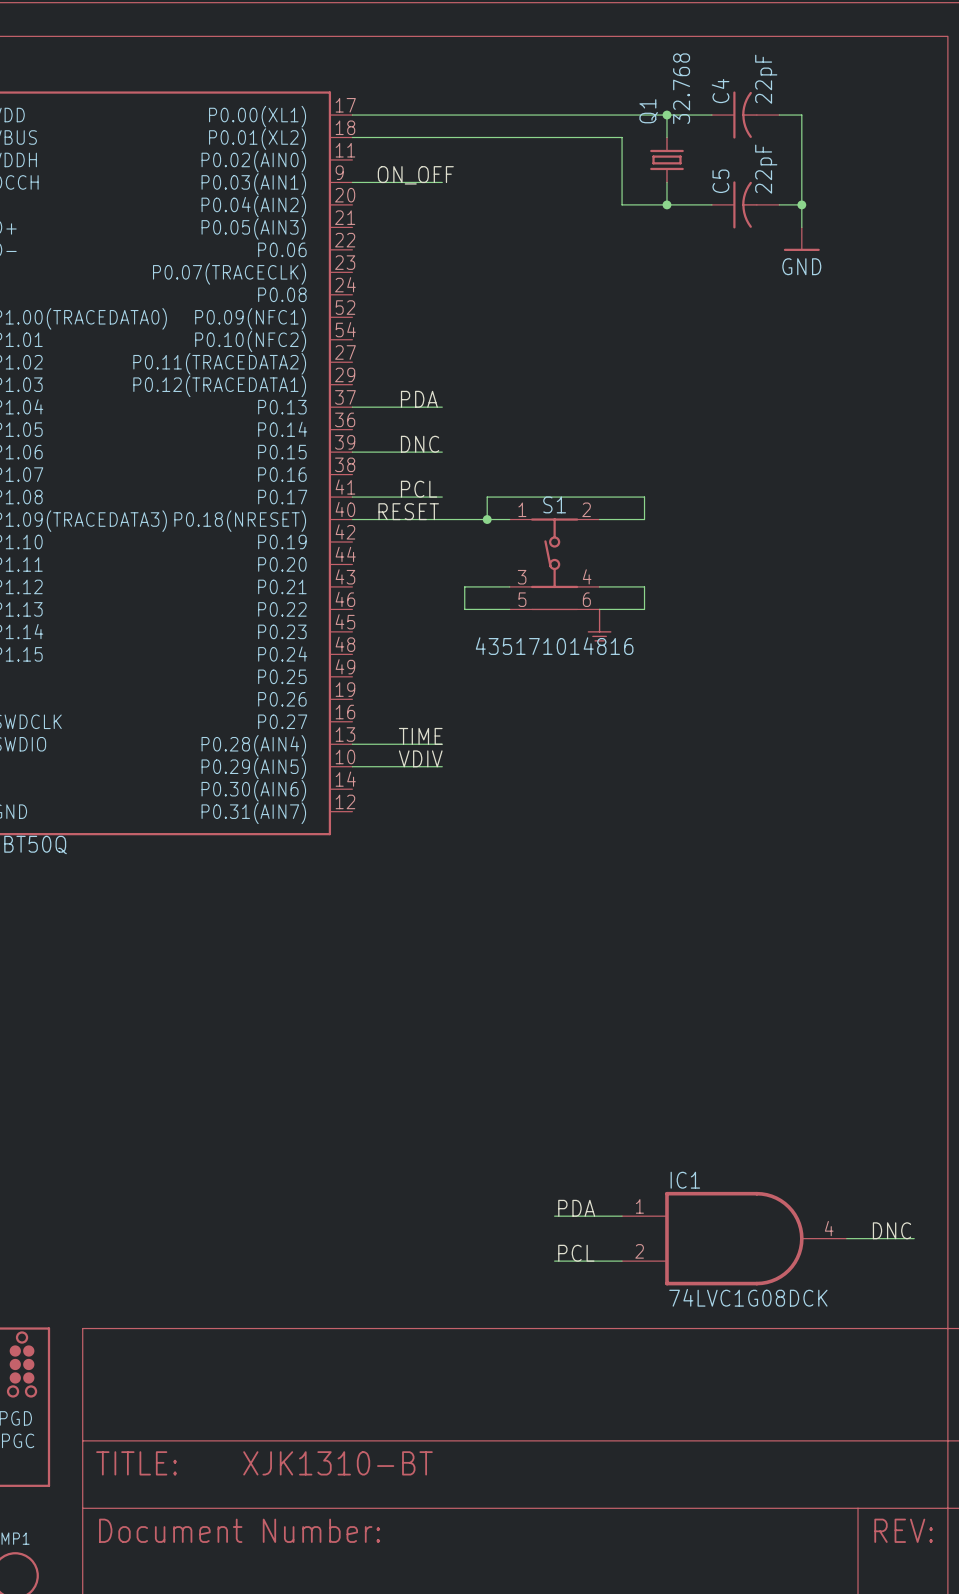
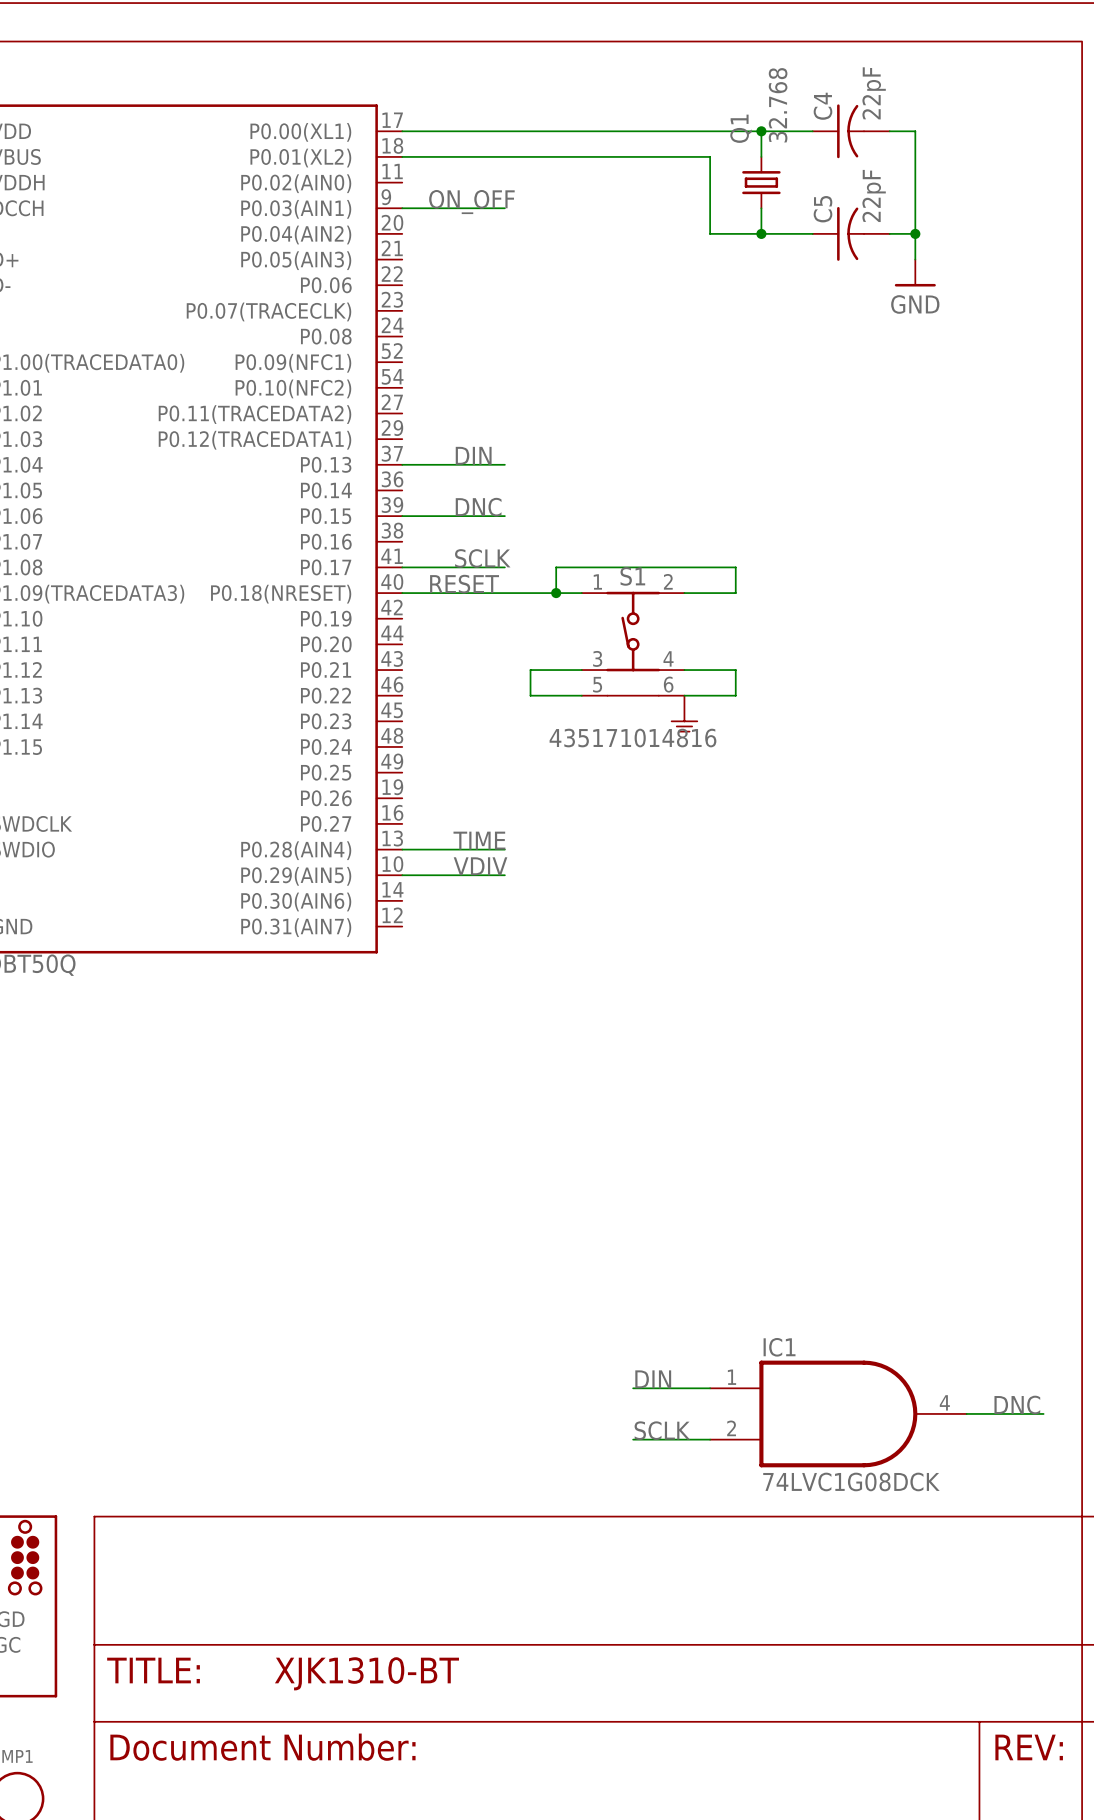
label: PDA (419, 399) -> DIN (473, 455)
label: PCL (419, 489) -> SCLK (482, 558)
label: PDA (576, 1208) -> DIN (653, 1379)
label: PCL (576, 1253) -> SCLK (662, 1430)

